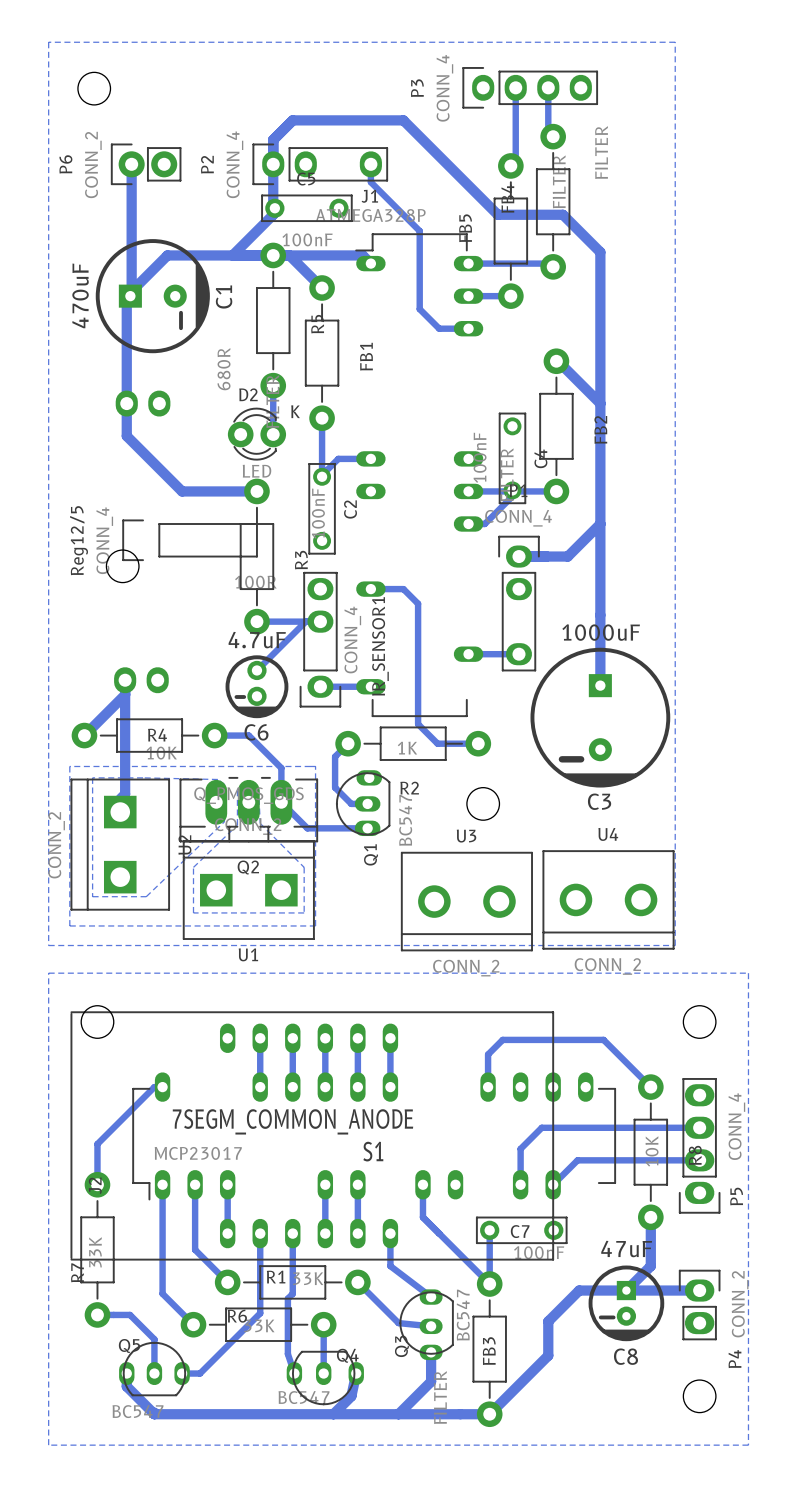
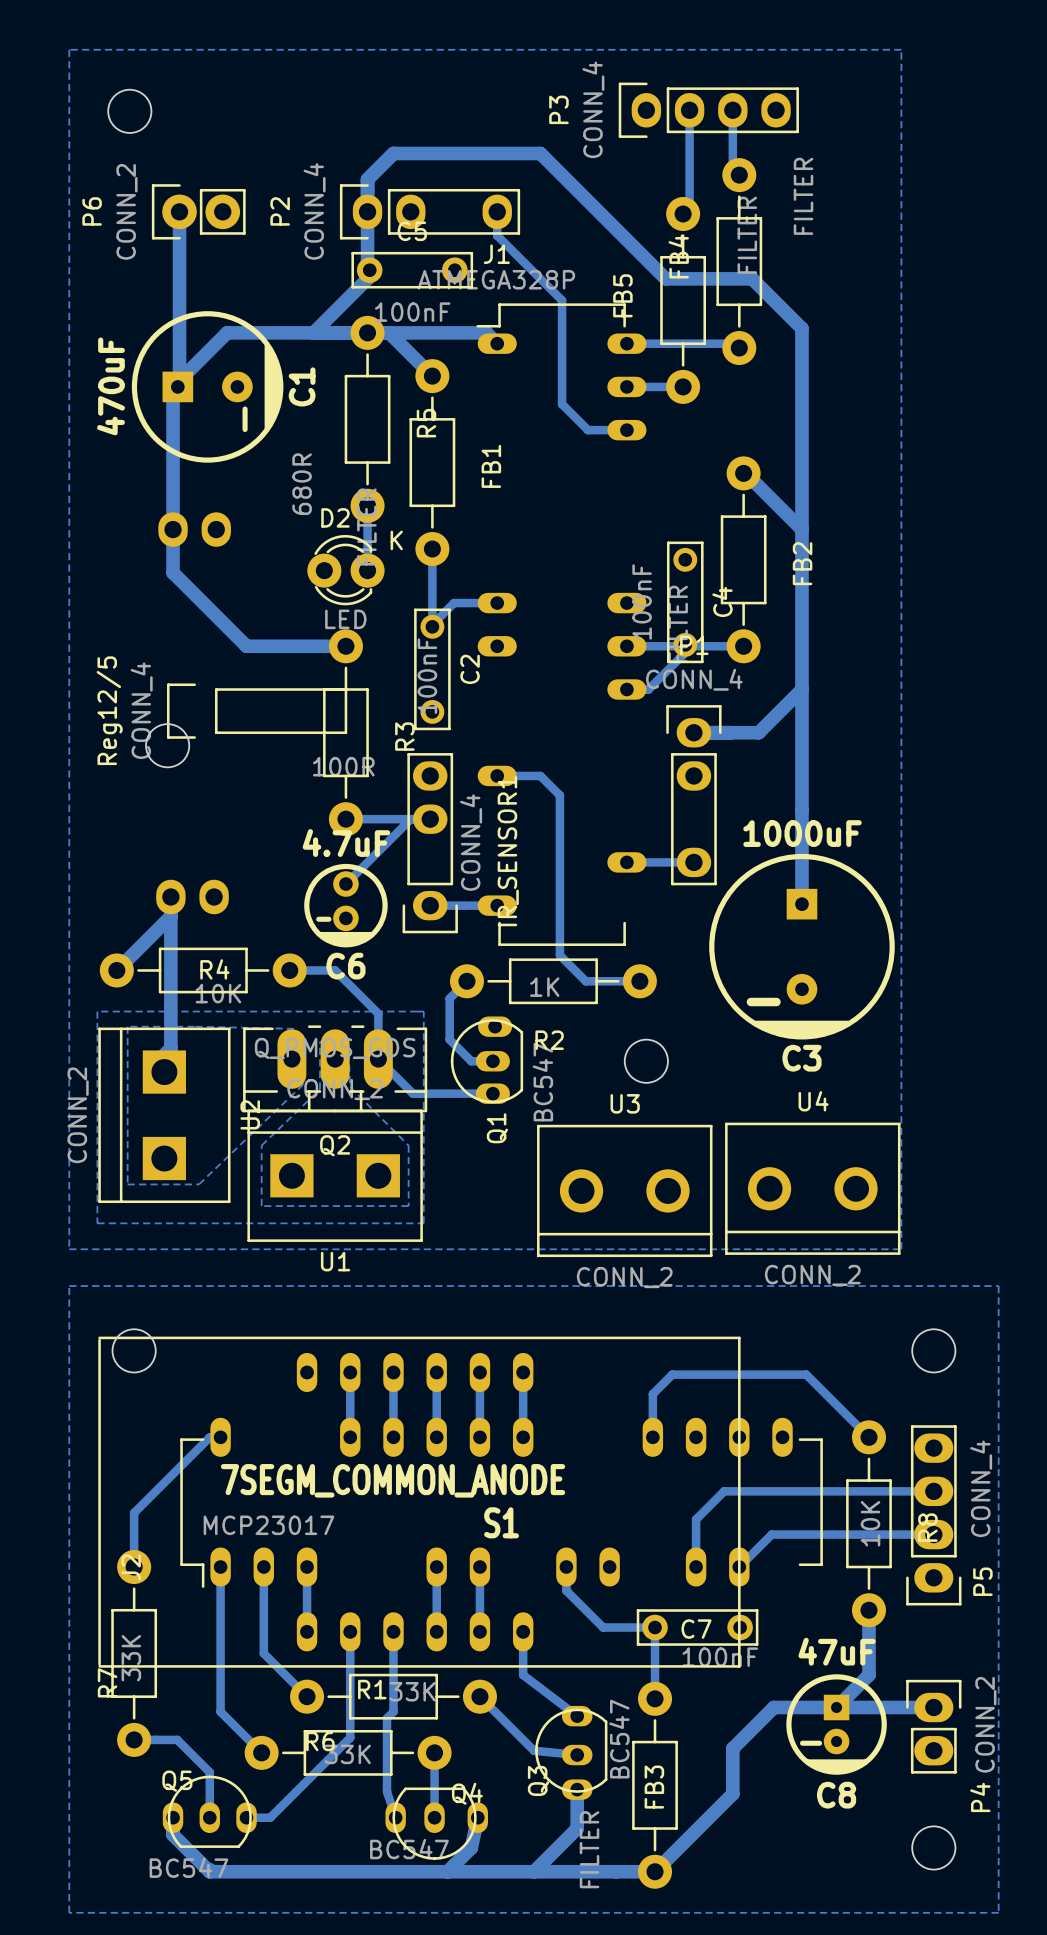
bottom track: (422, 1202) (422, 1217) (489, 1284) -> (566, 1590) (603, 1627) (655, 1627)

